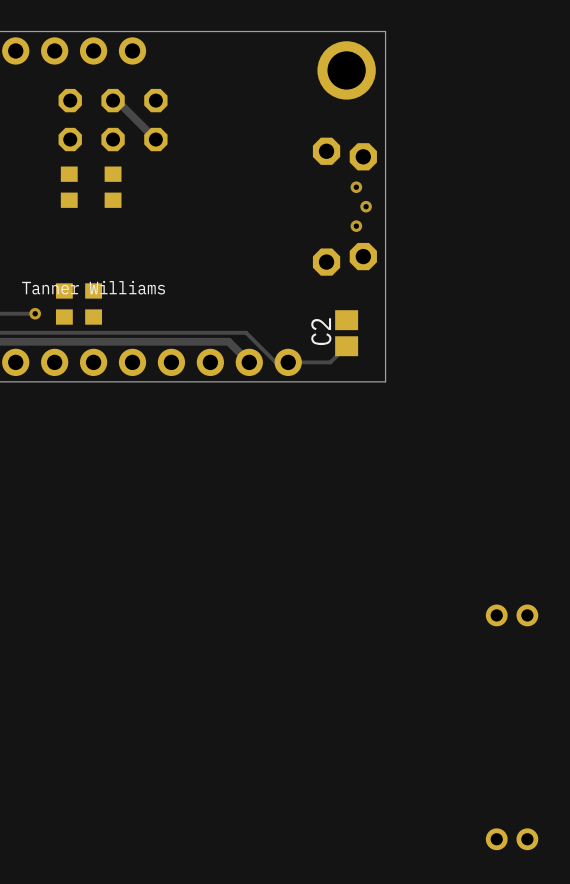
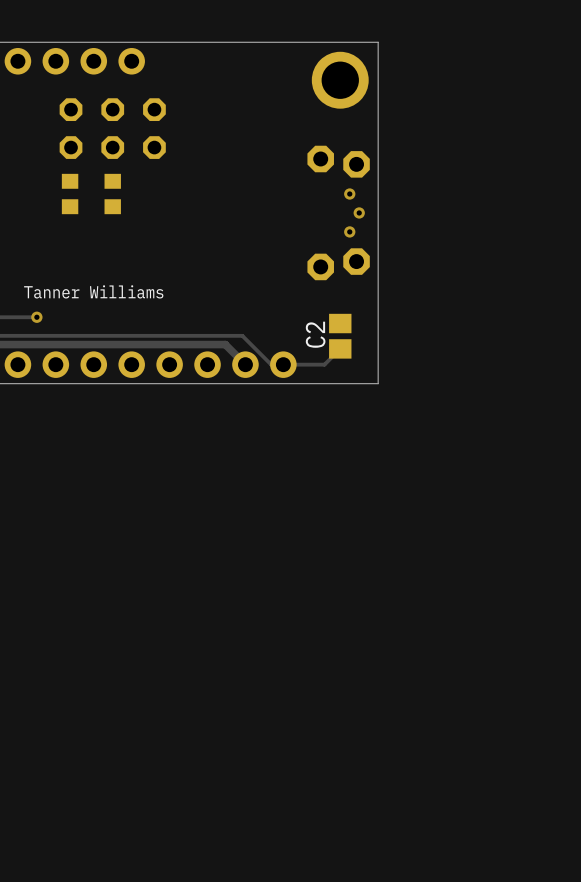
track: (113, 100) (118, 101) (155, 139) -> none
part: (64, 304) -> none
part: (93, 304) -> none
part: (512, 615) -> none
part: (512, 839) -> none

